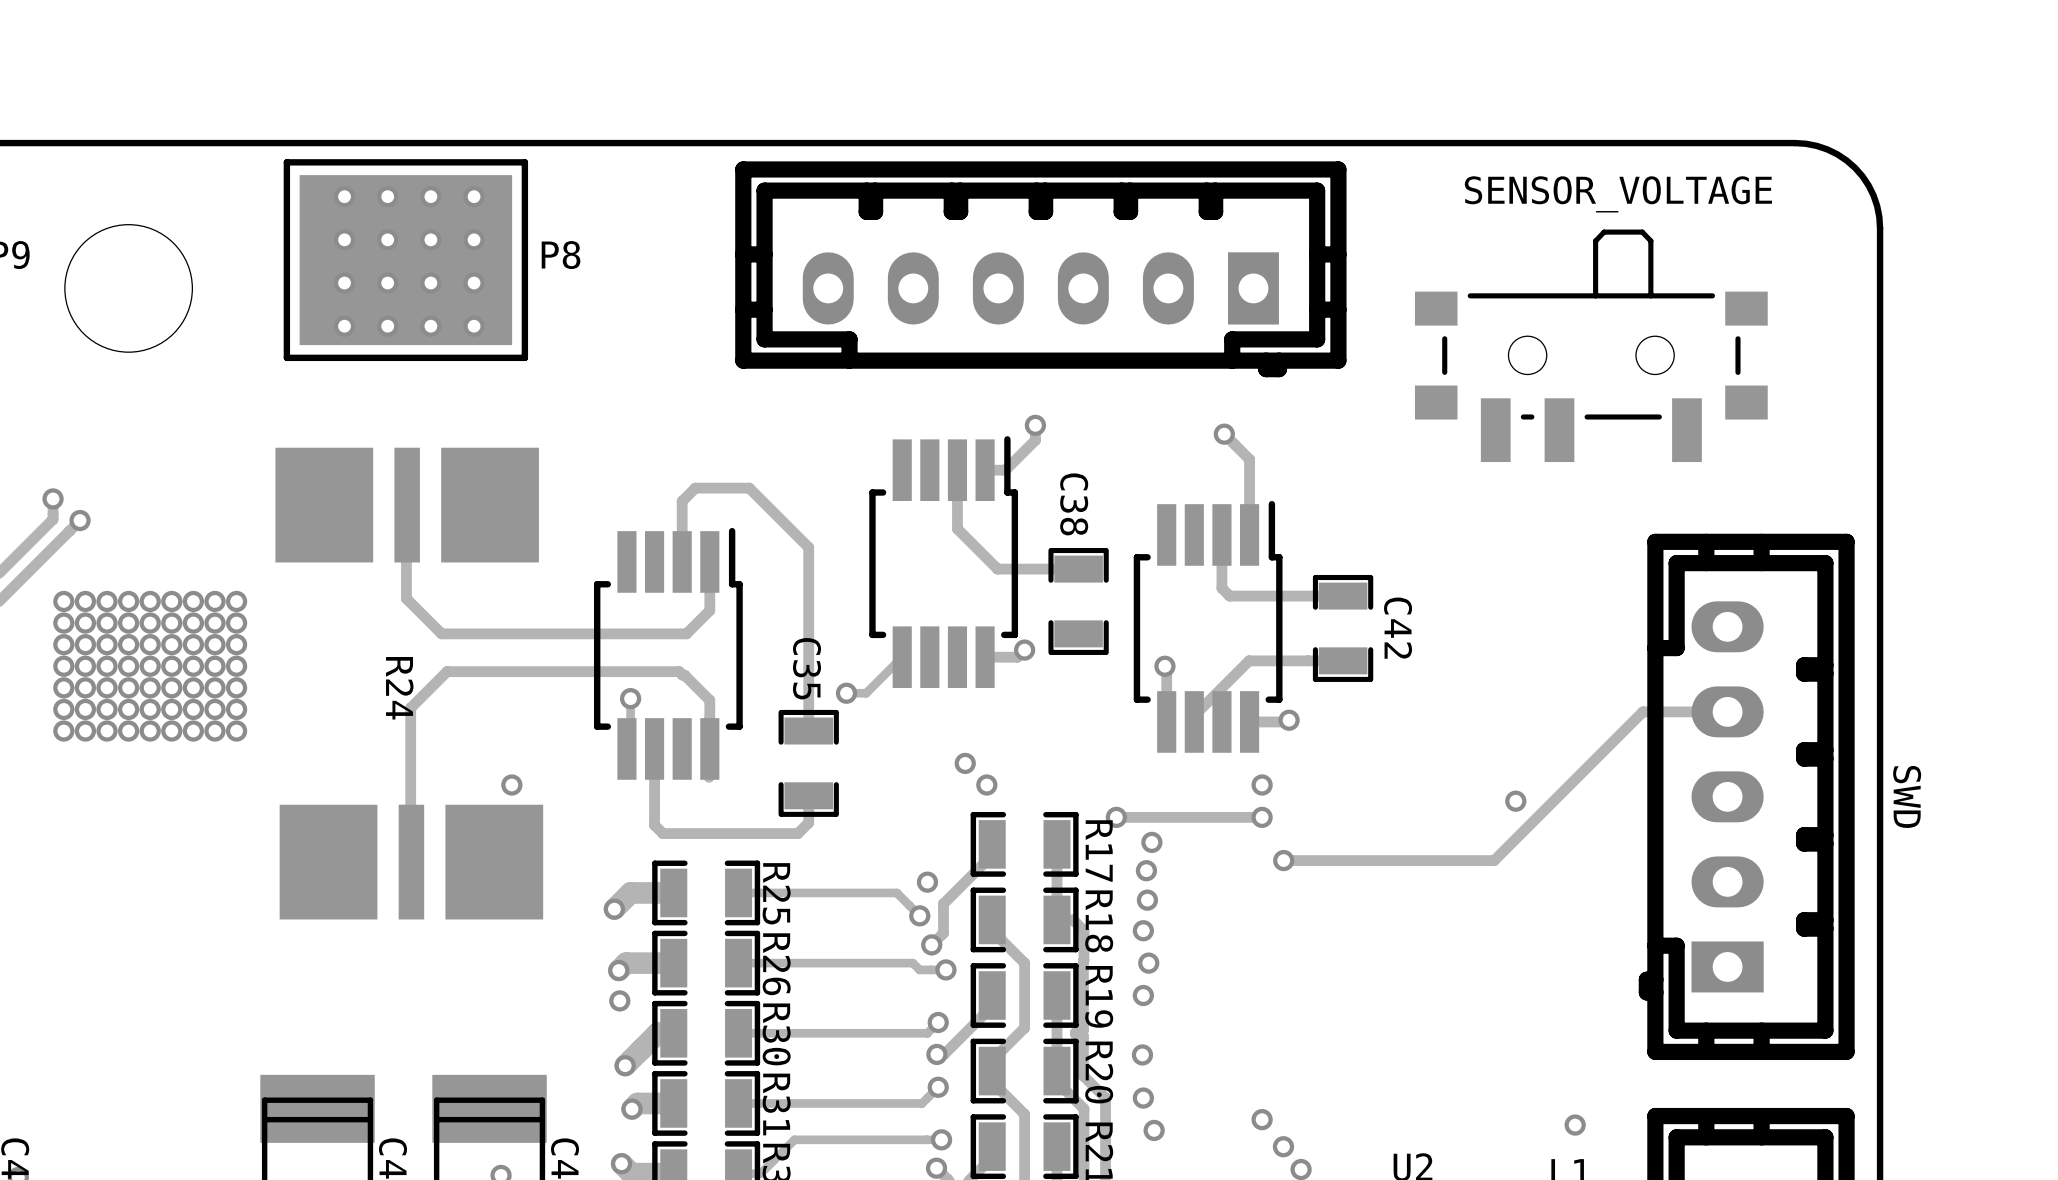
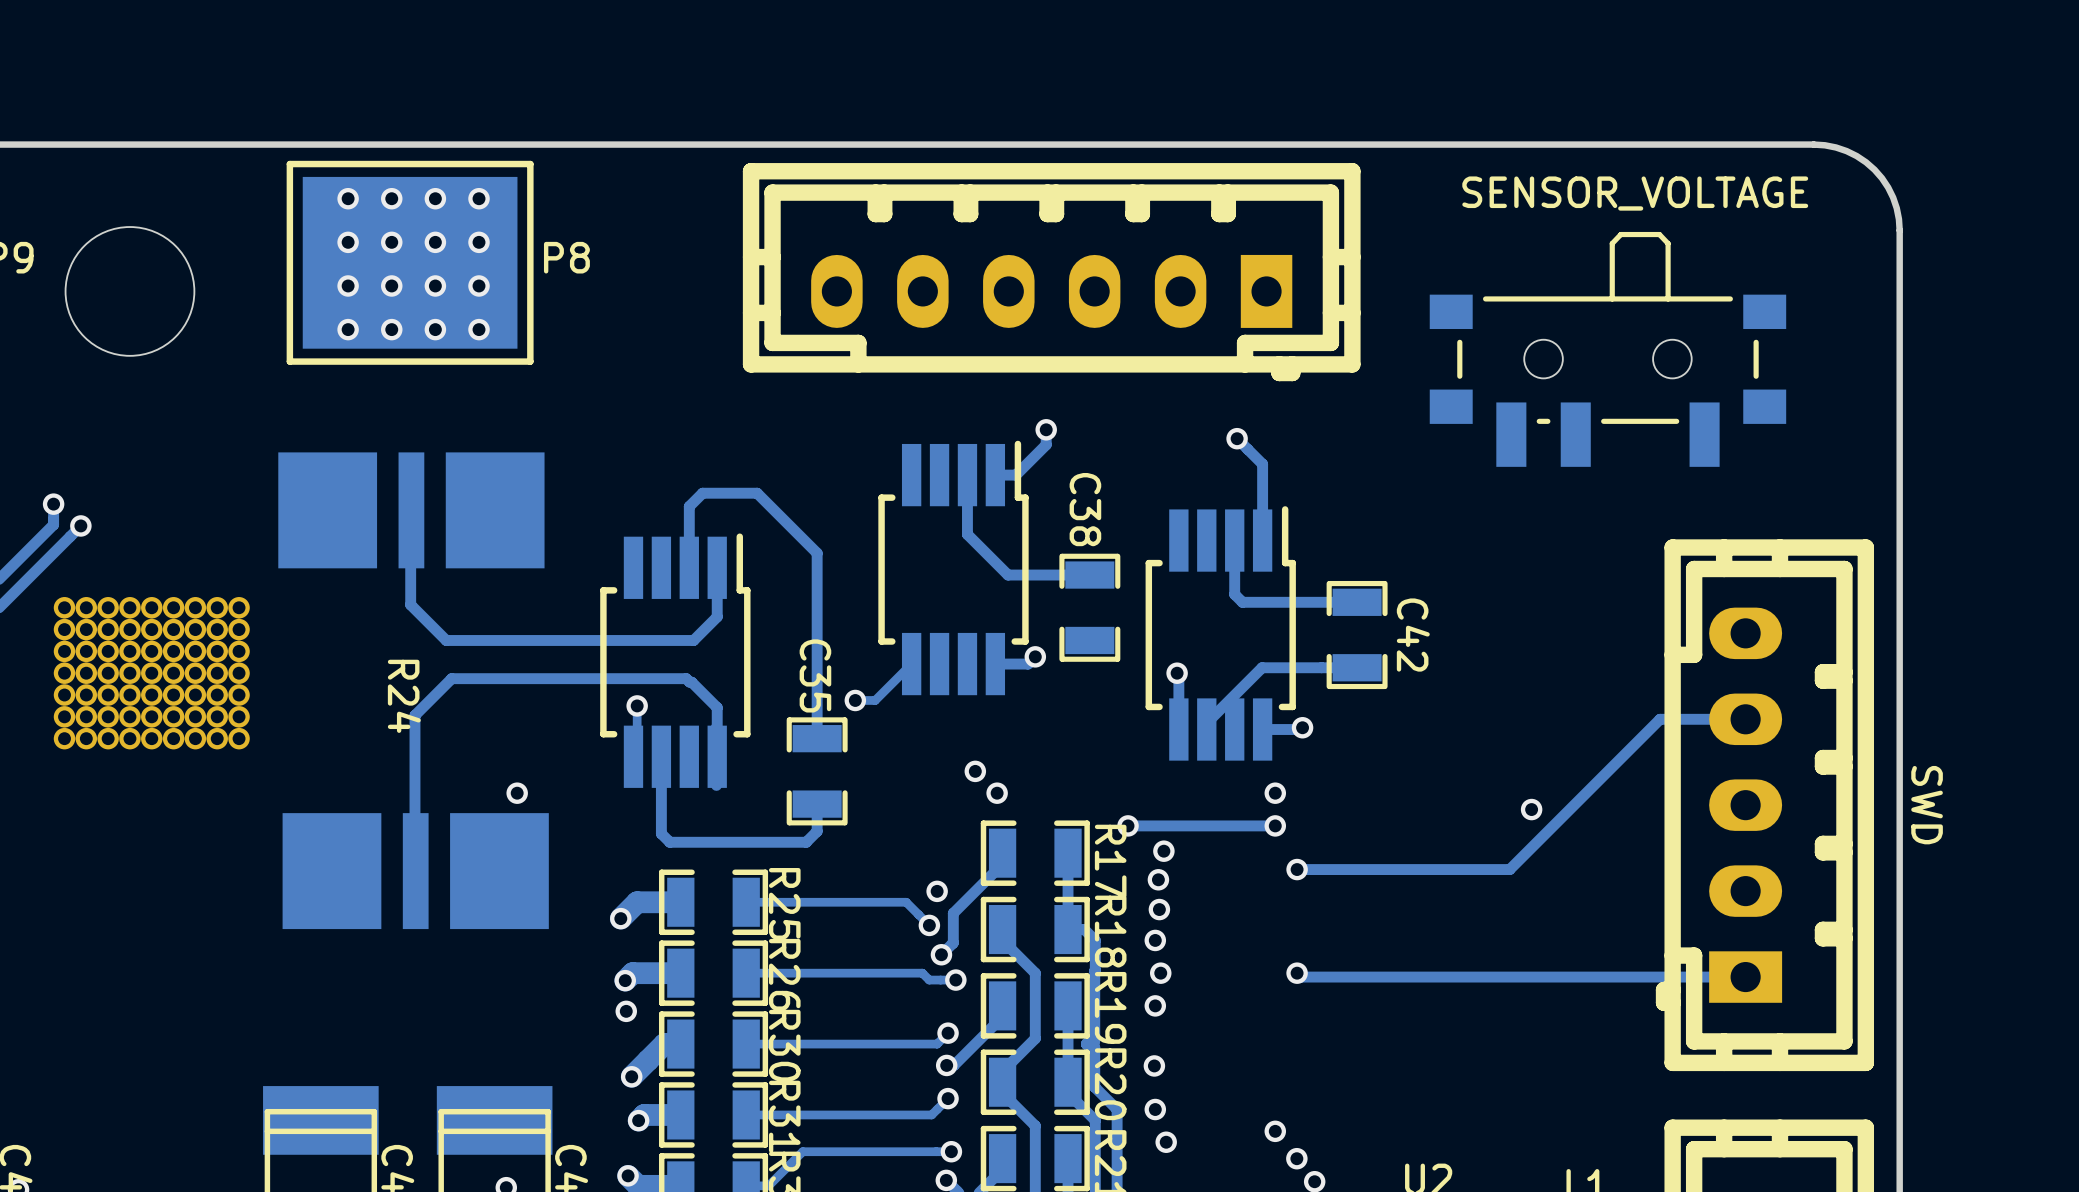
track: none -> (1297, 973) (1300, 977) (1745, 977)
via: none -> (1297, 973)
via: (1575, 1125) -> none

